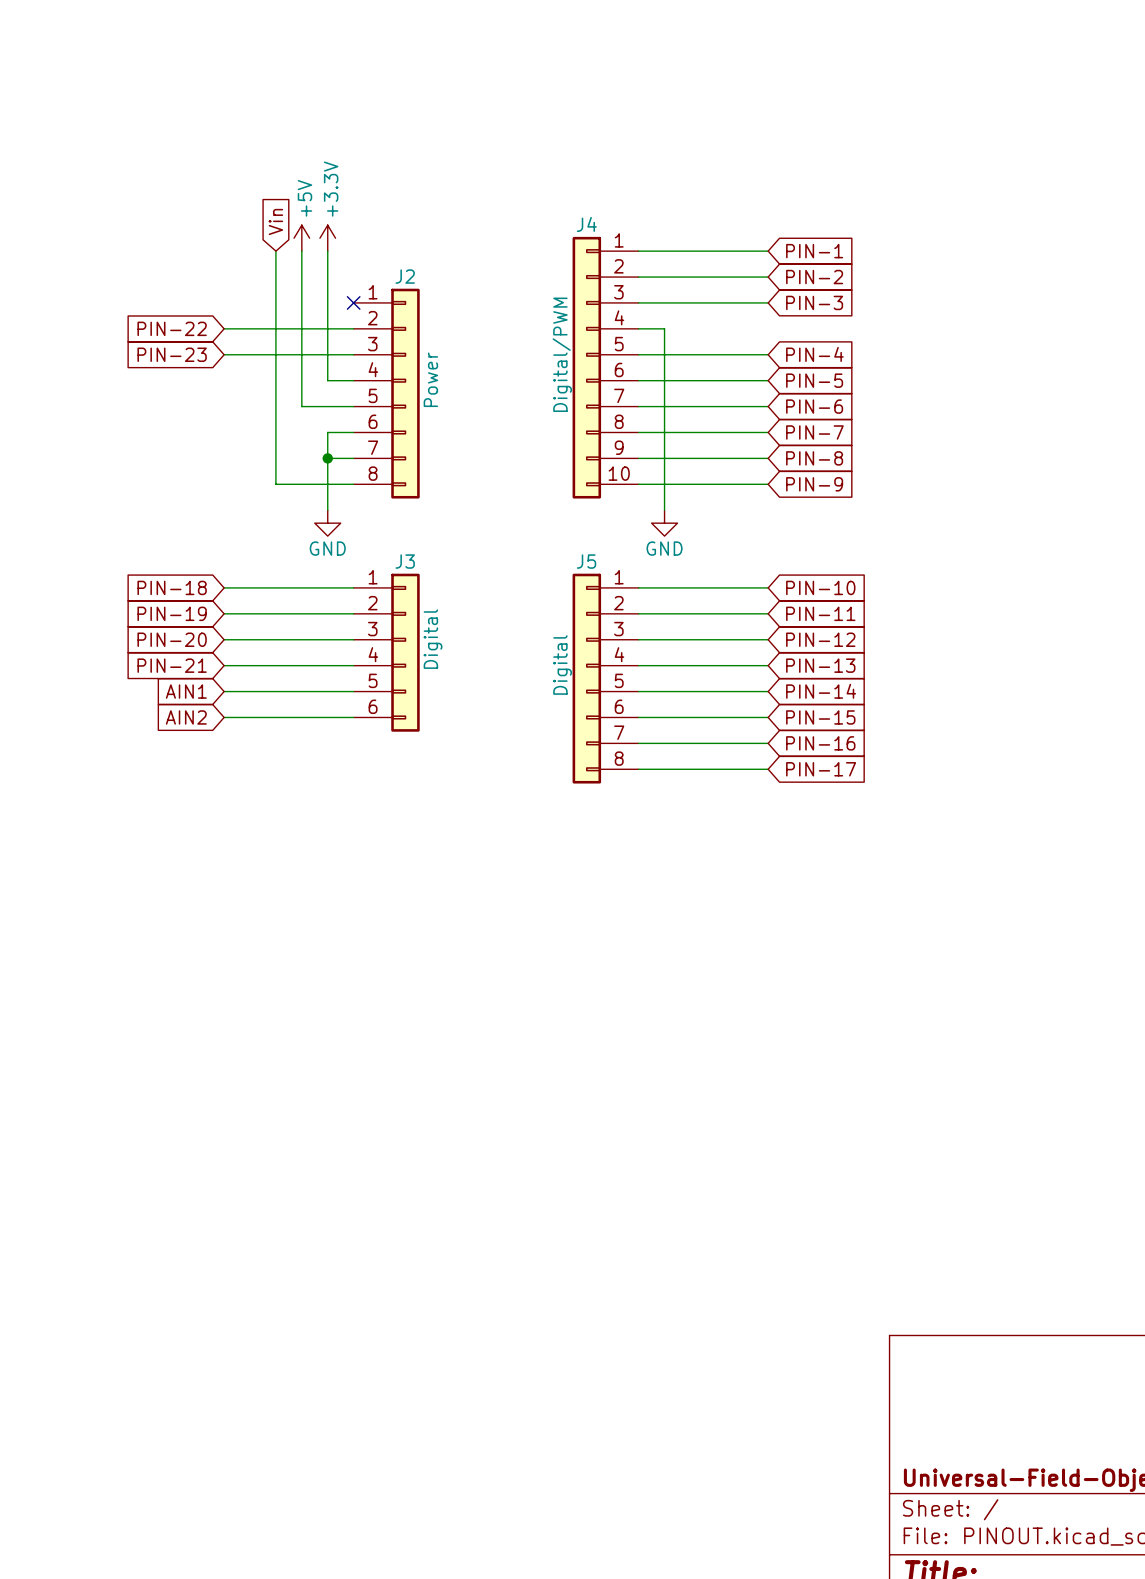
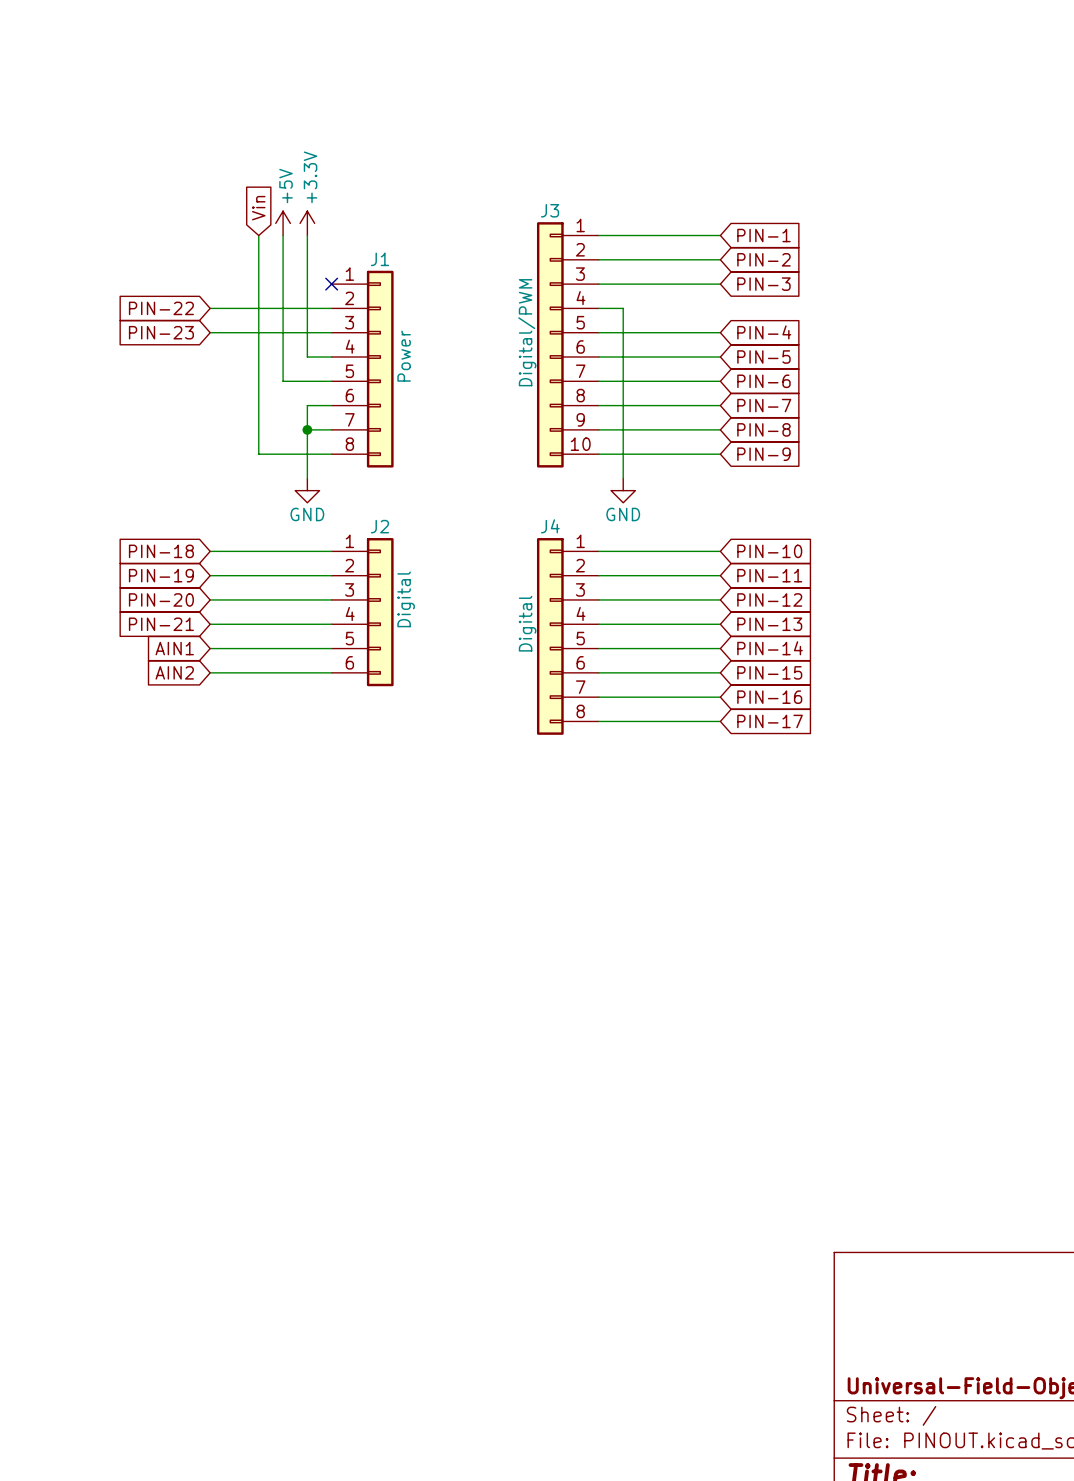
J4 name: J4 (586, 224) -> J3 (550, 210)
J2 name: J2 (405, 276) -> J1 (379, 259)
J3 name: J3 (405, 561) -> J2 (379, 526)
J5 name: J5 (586, 561) -> J4 (550, 526)

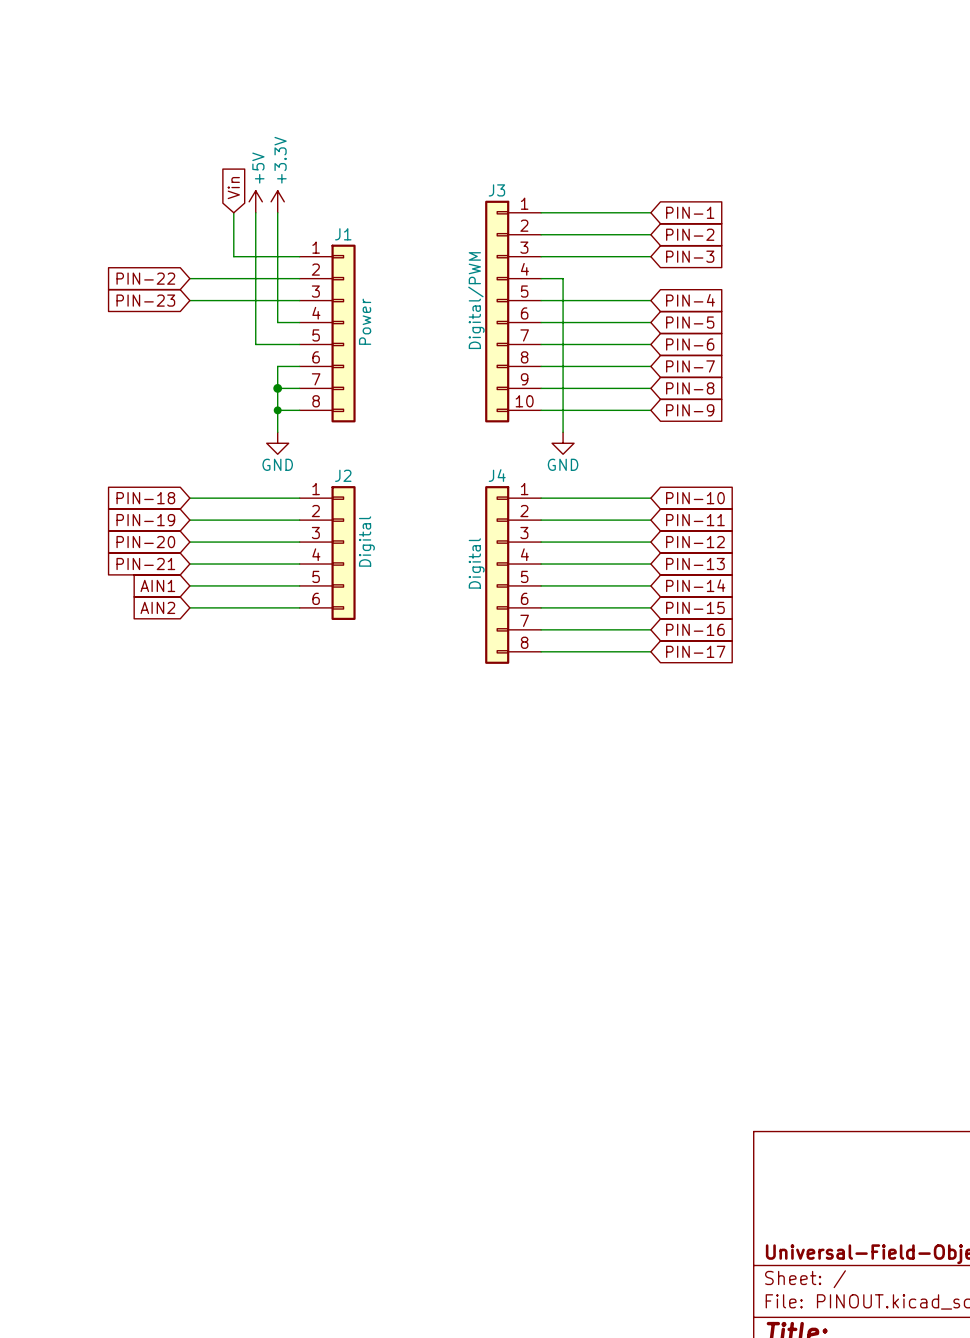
wire: (258, 284) (258, 454) (307, 454) -> (233, 256) (299, 256)
no-connect mark: (331, 284) -> none
junction: none -> (277, 410)

